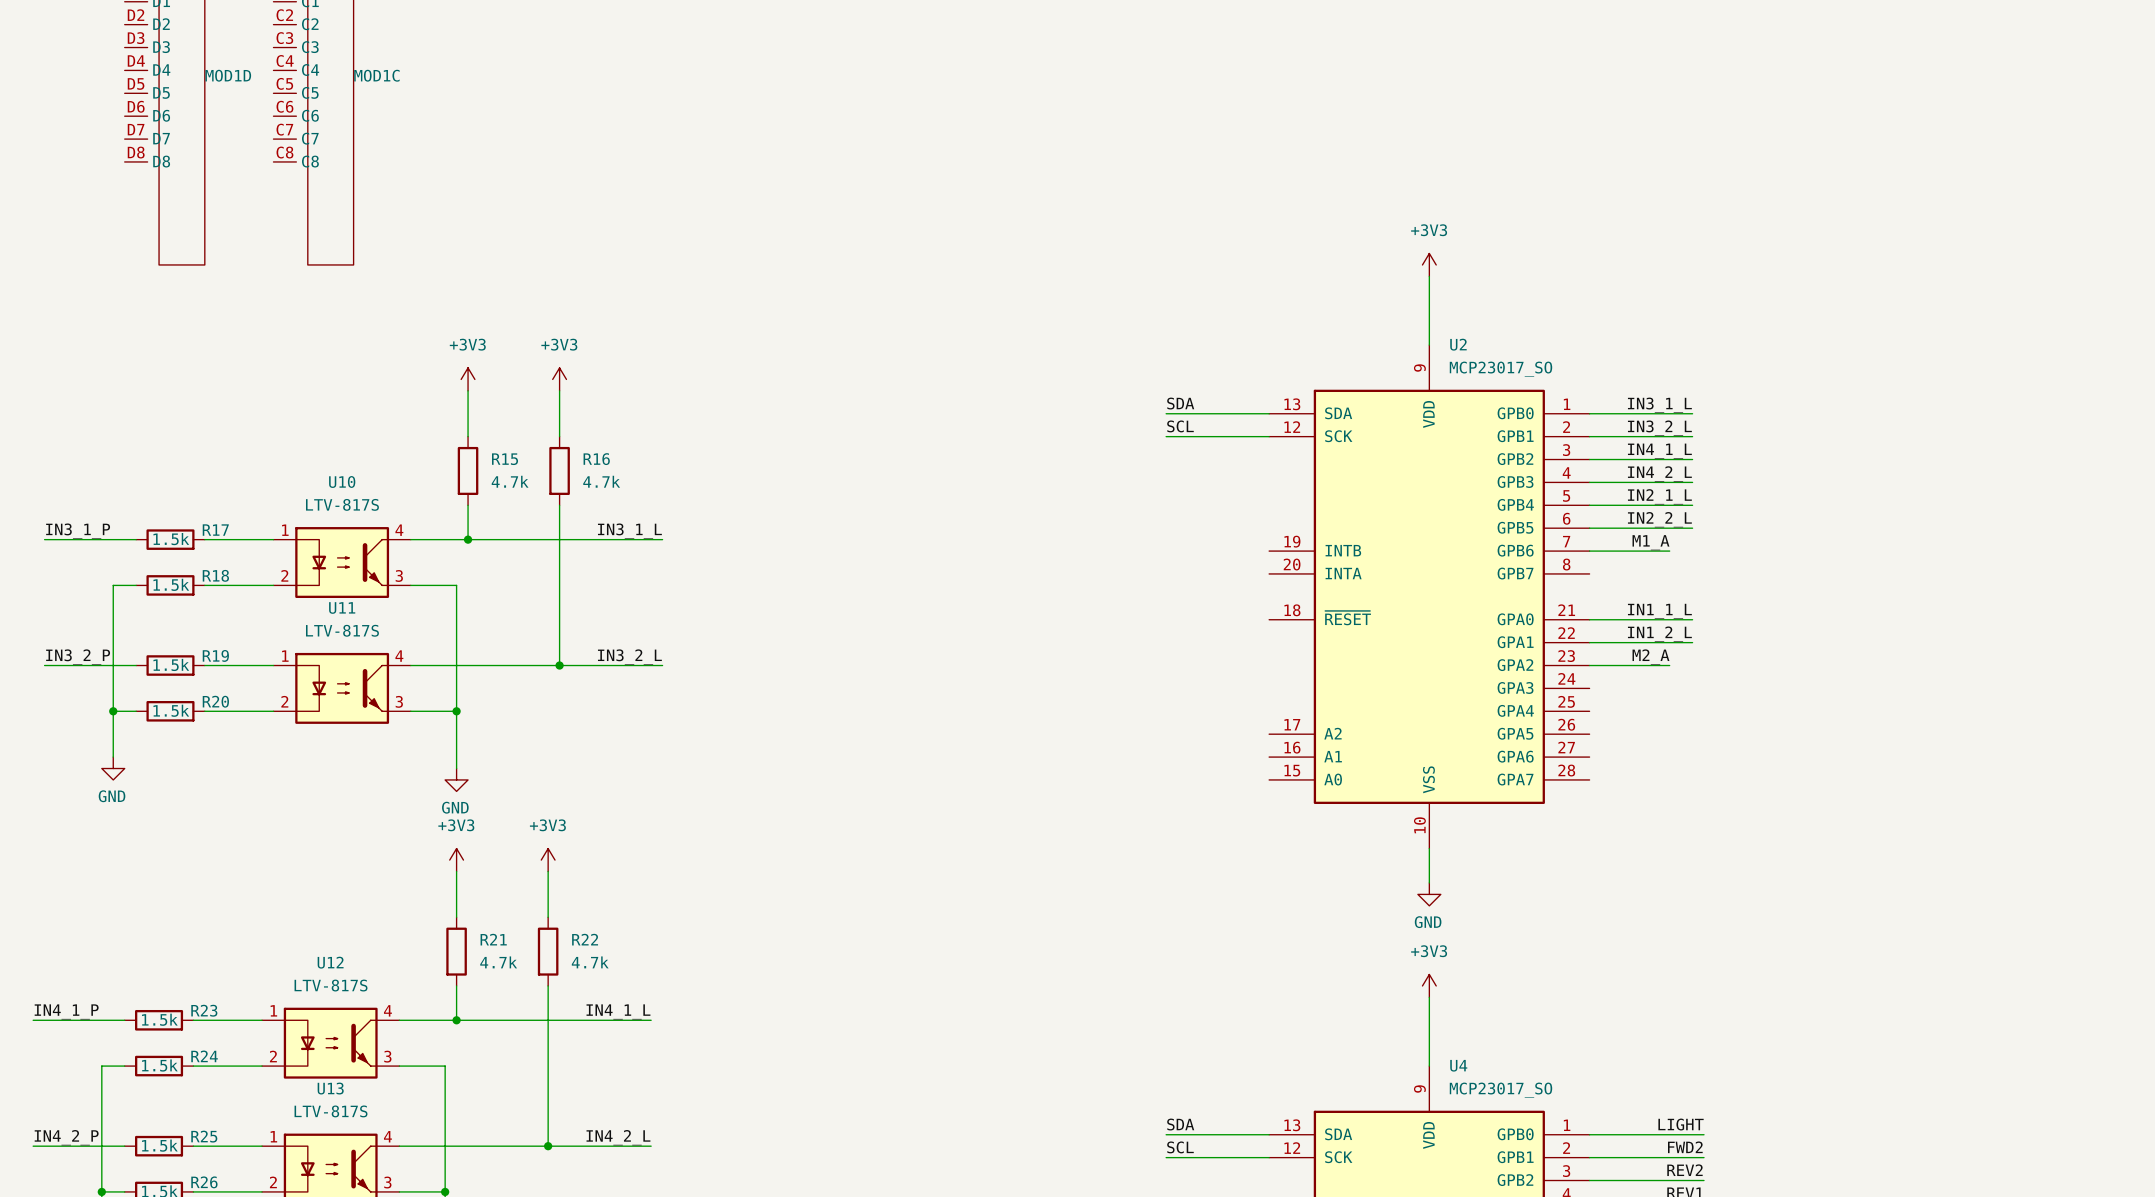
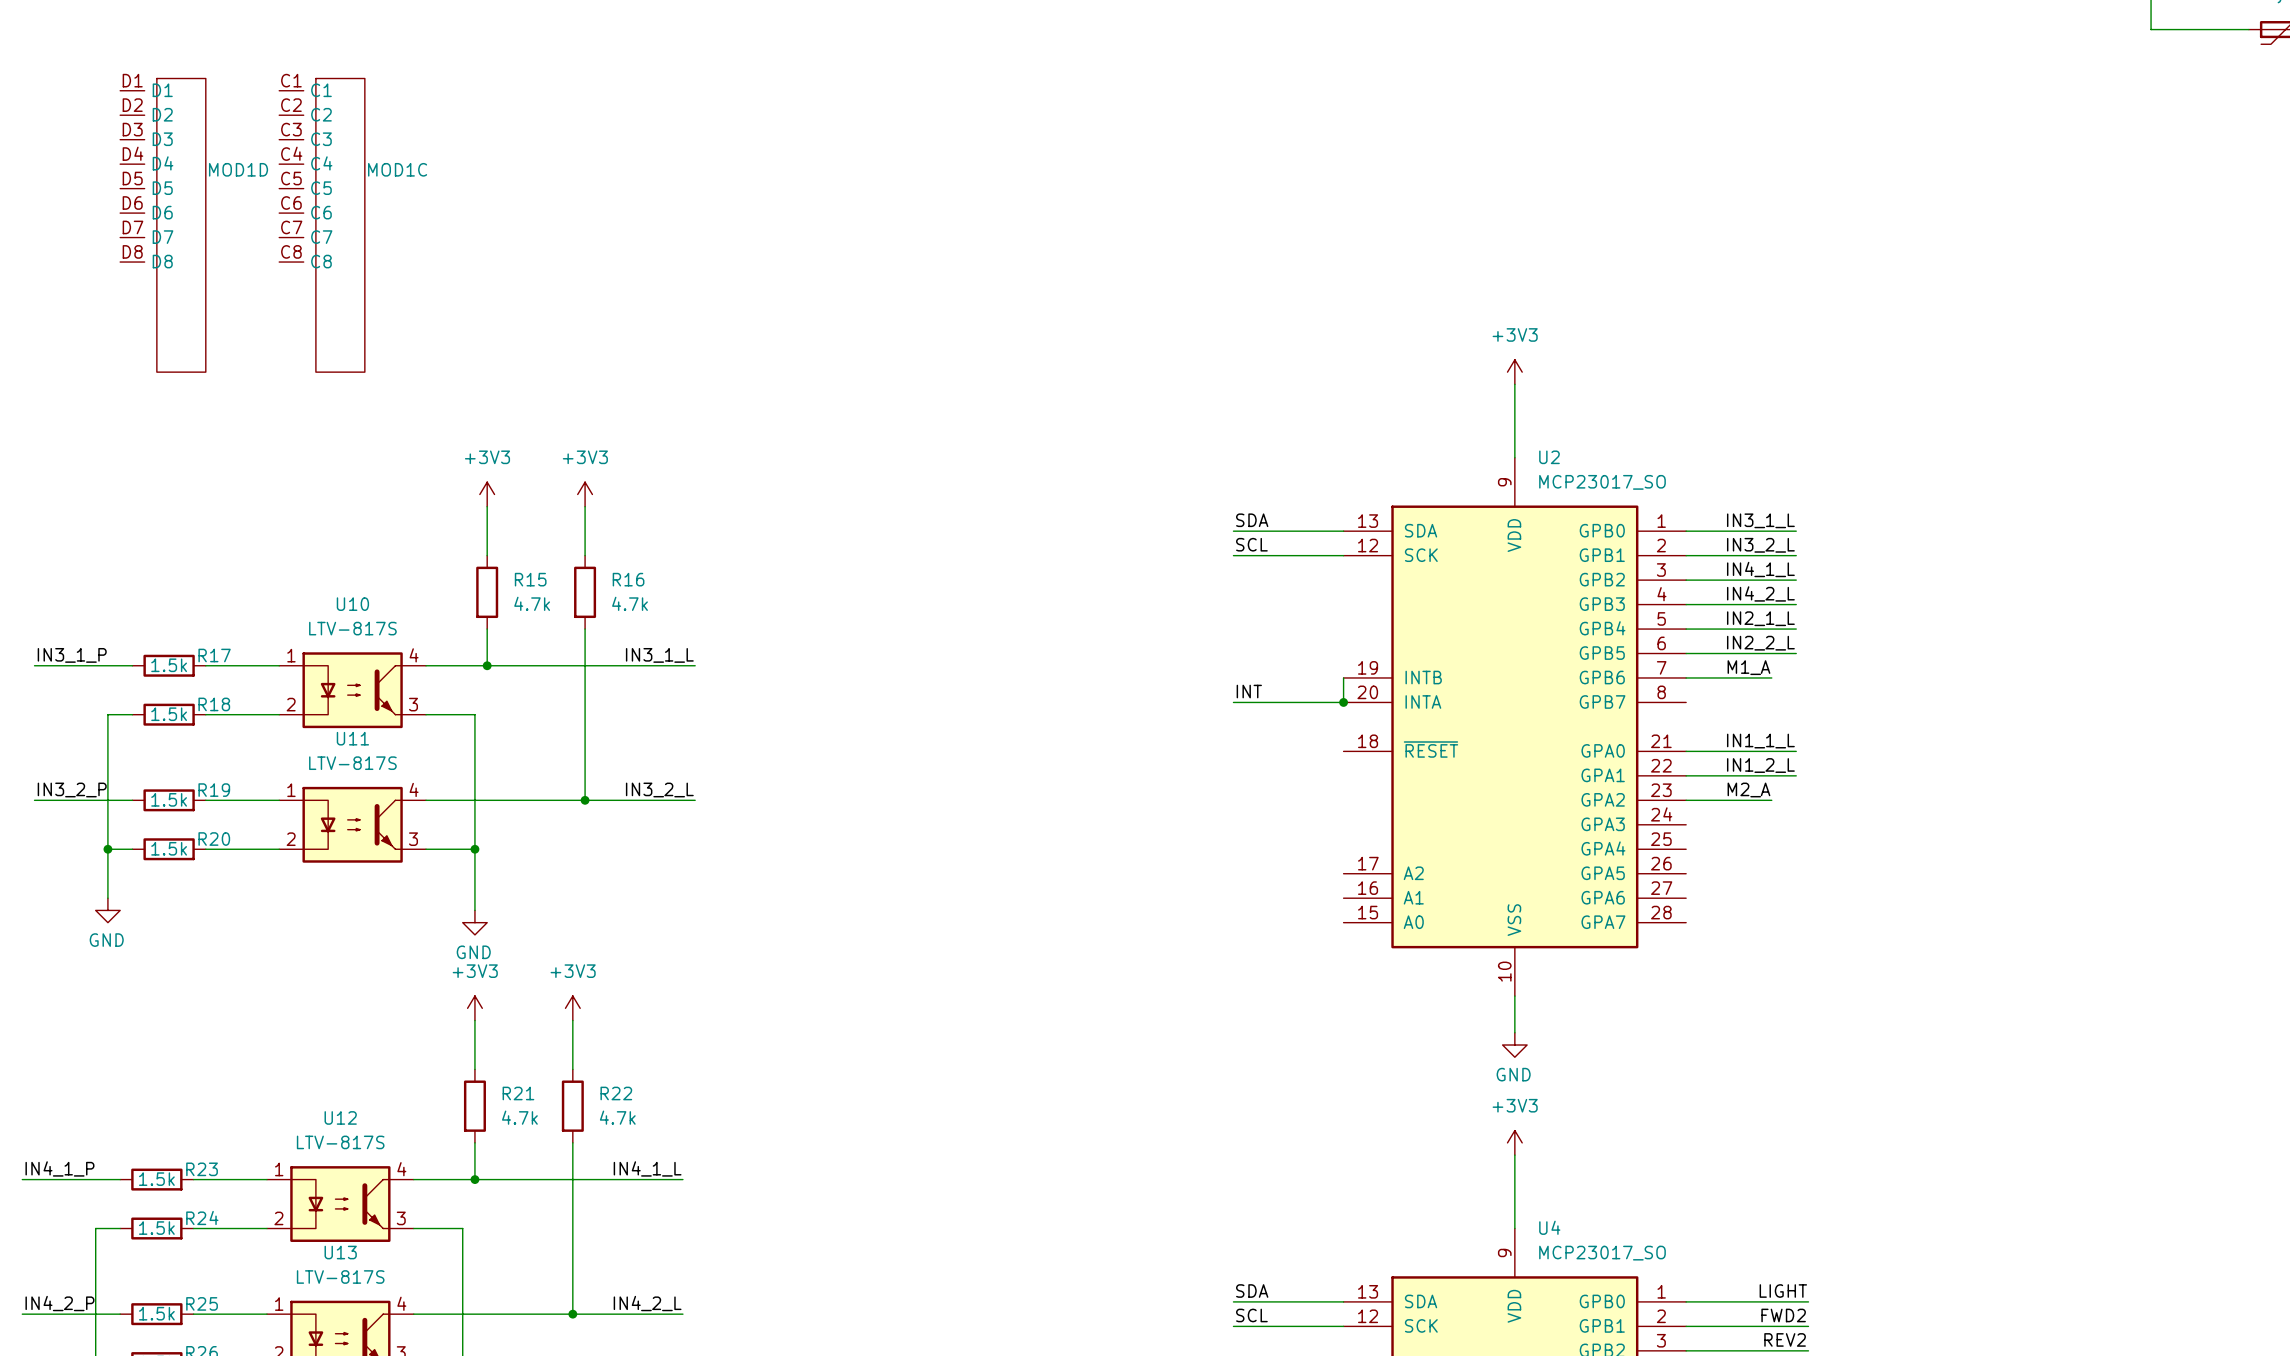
wire: none -> (1343, 677) (1343, 702) (1233, 702)
label: none -> INT (1249, 691)
junction: none -> (1343, 702)

